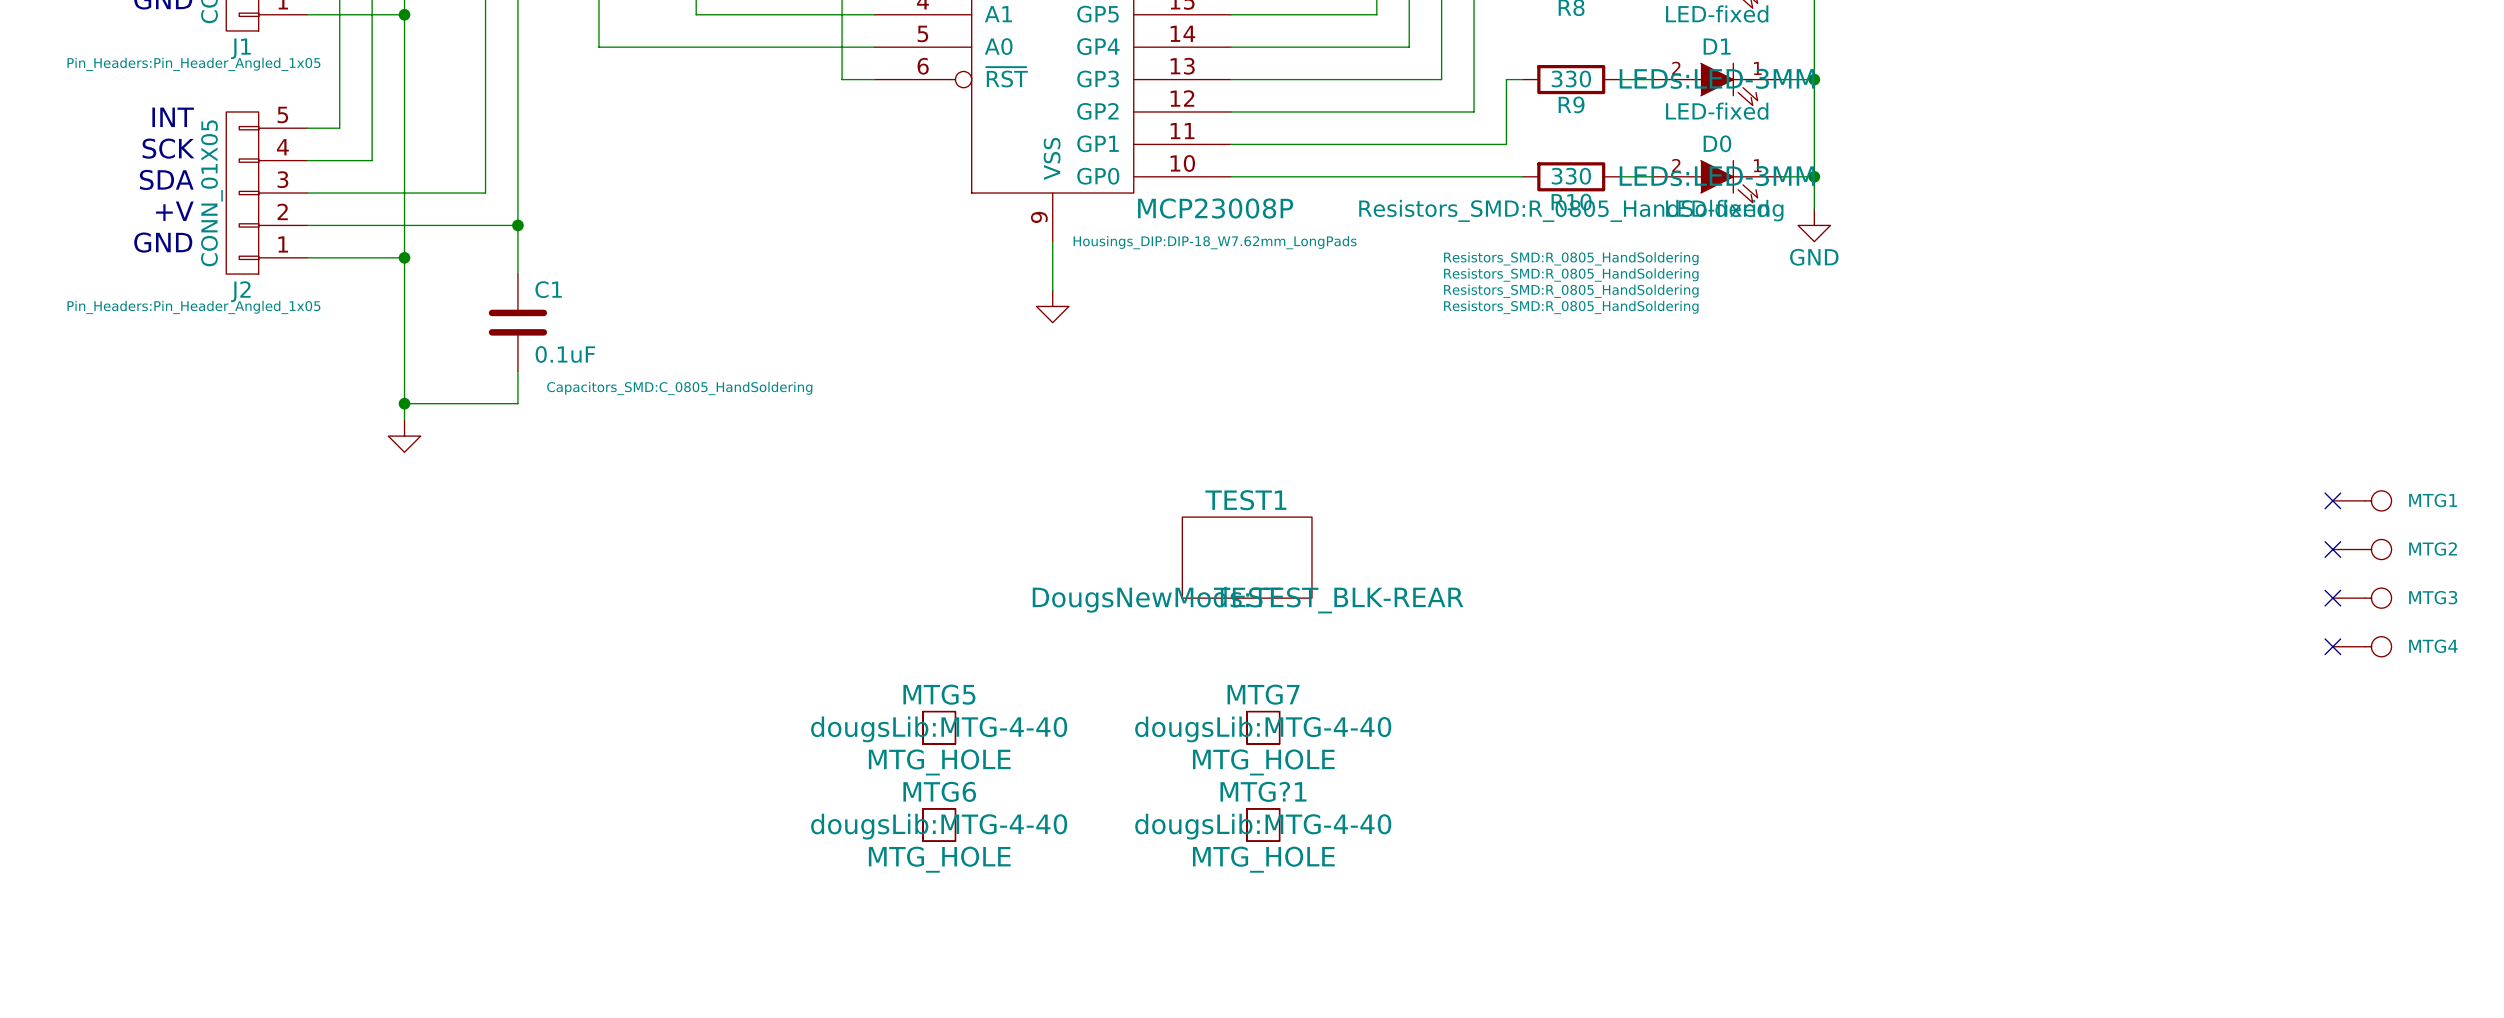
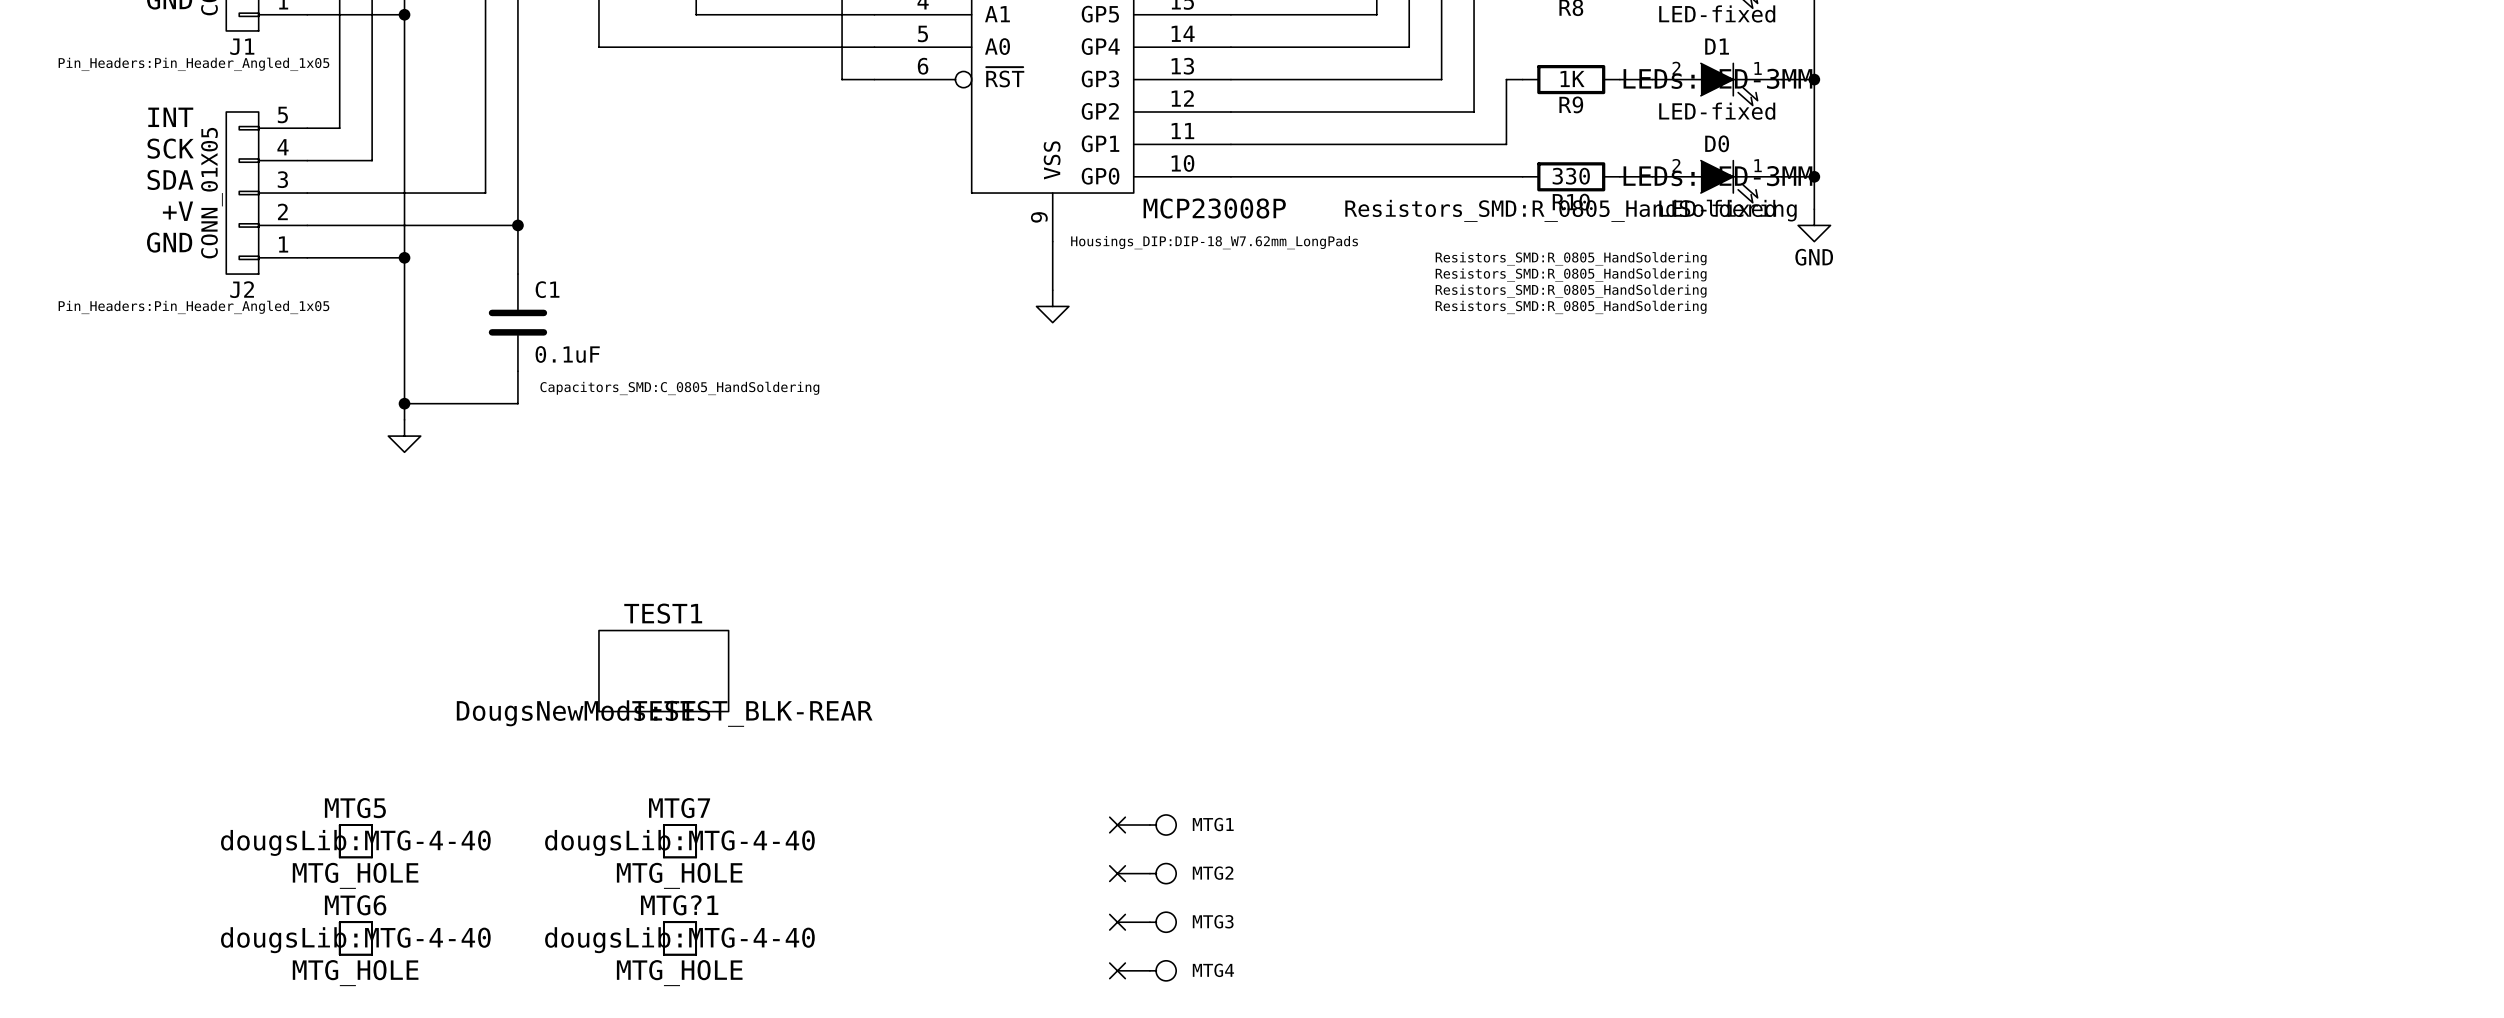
R9 value: 330 (1571, 78) -> 1K (1572, 78)
no-connect mark: (2332, 500) -> none
MTG1 position: (2362, 500) -> (1146, 825)
no-connect mark: (2332, 549) -> none
MTG2 position: (2362, 549) -> (1146, 873)
TEST1 position: (1247, 557) -> (663, 671)
no-connect mark: (2332, 598) -> none
MTG3 position: (2362, 598) -> (1146, 922)
no-connect mark: (2332, 646) -> none
MTG4 position: (2362, 646) -> (1146, 970)
MTG5 position: (939, 727) -> (355, 841)
MTG7 position: (1263, 727) -> (680, 841)
MTG6 position: (939, 825) -> (355, 938)
no-connect mark: none -> (1117, 825)
MTG?1 position: (1263, 825) -> (680, 938)
no-connect mark: none -> (1117, 873)
no-connect mark: none -> (1117, 922)
no-connect mark: none -> (1117, 970)

